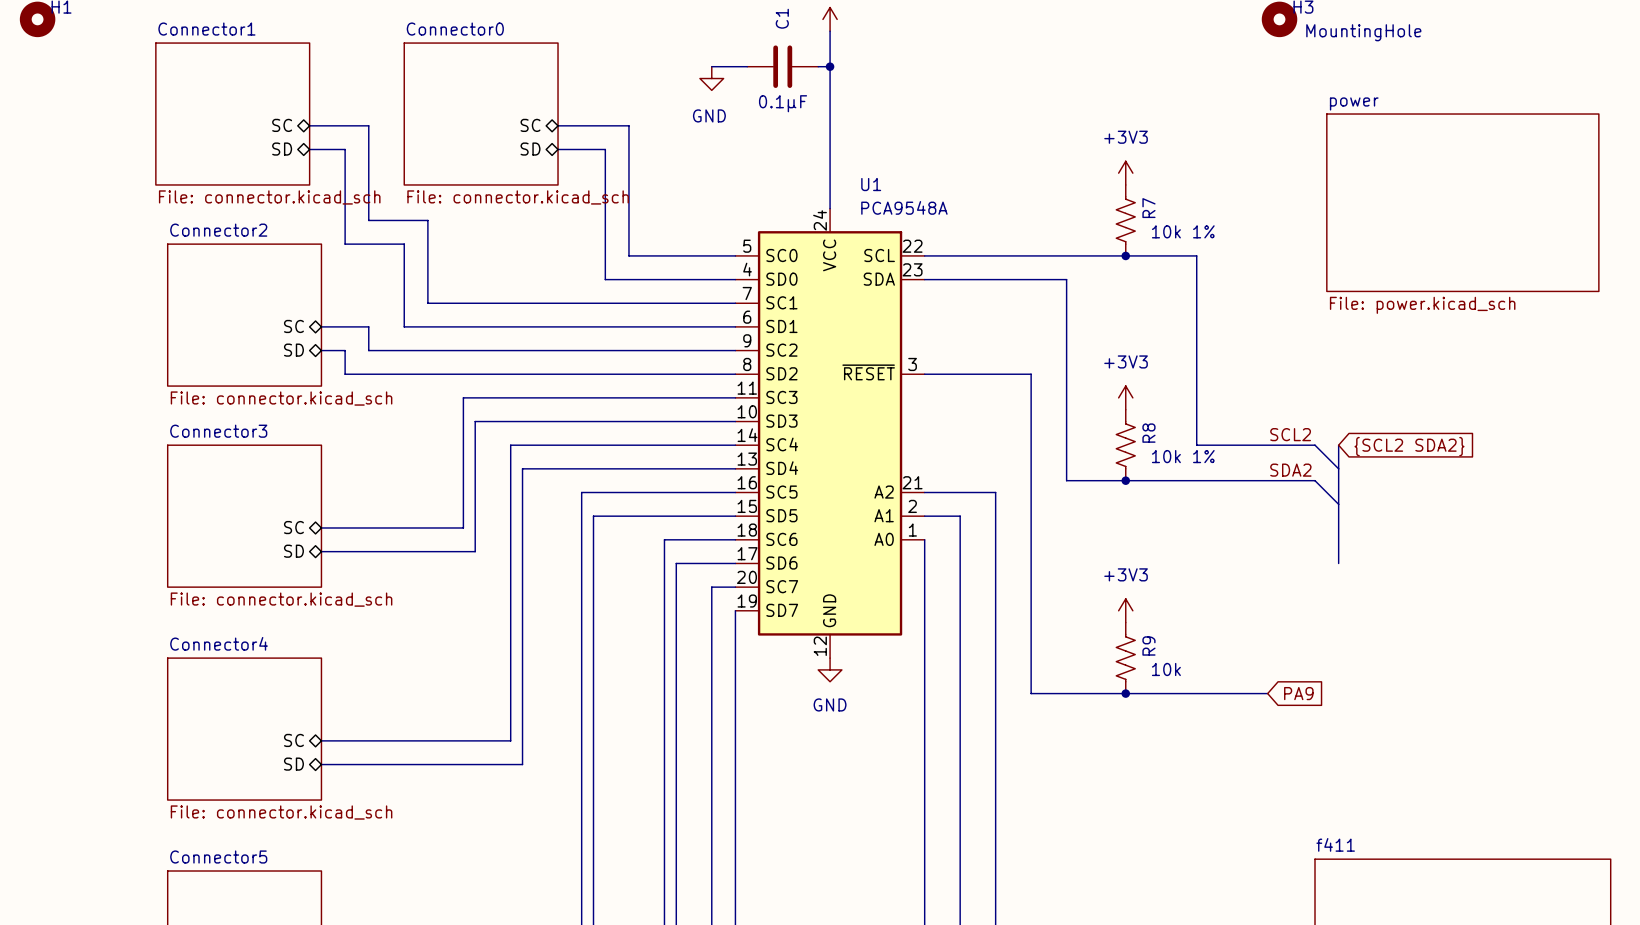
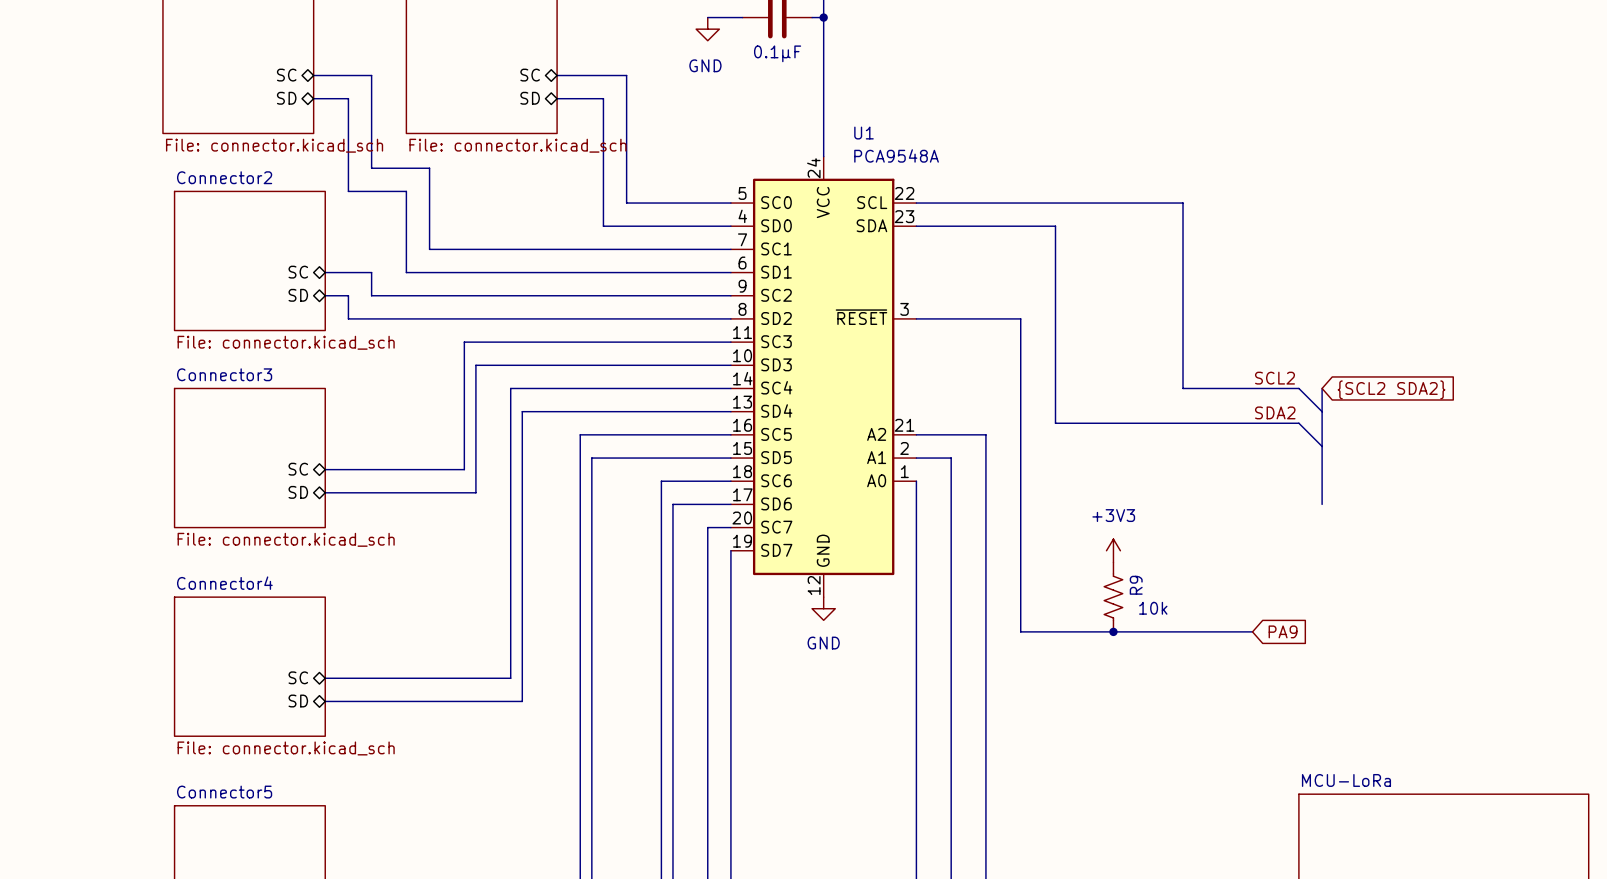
power symbol: +3V3 (1125, 173) -> none
sheet power: File: power.kicad_sch (1462, 202) -> none
R7: 10k 1% (1125, 220) -> none
junction: (1125, 255) -> none
power symbol: +3V3 (1125, 397) -> none
R8: 10k 1% (1125, 445) -> none
junction: (1125, 480) -> none
sheet f411 name: f411 (1335, 844) -> MCU-LoRa (1346, 780)

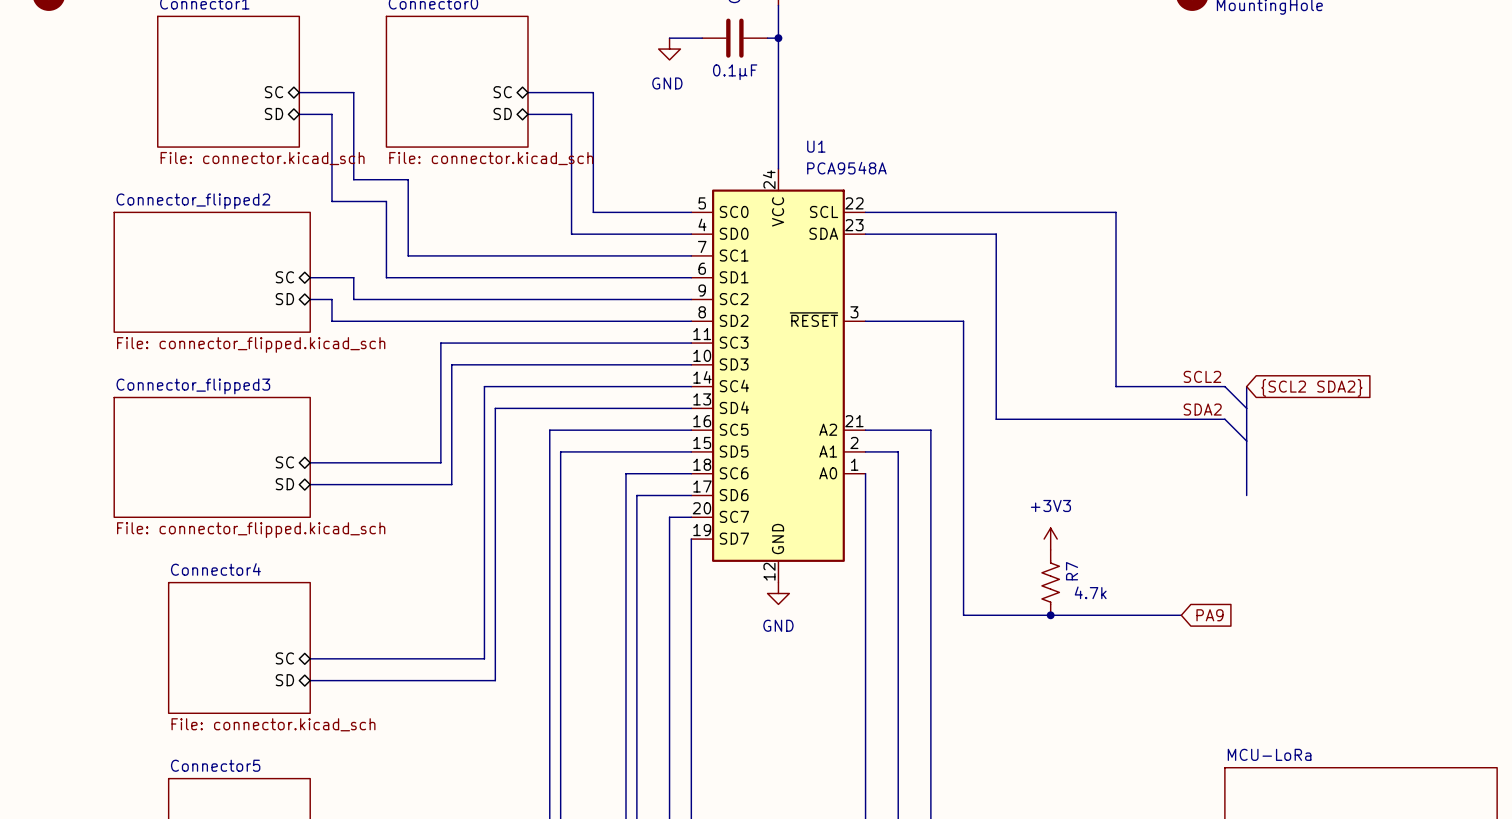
sheet Connector2: File: connector.kicad_sch (249, 260) -> none
sheet Connector_flipped2: none -> File: connector_flipped.kicad_sch (212, 272)
sheet Connector3: File: connector.kicad_sch (249, 458) -> none
sheet Connector_flipped3: none -> File: connector_flipped.kicad_sch (212, 457)
R9 name: R9 (1136, 585) -> R7 (1072, 571)
R9 value: 10k (1153, 608) -> 4.7k (1090, 592)

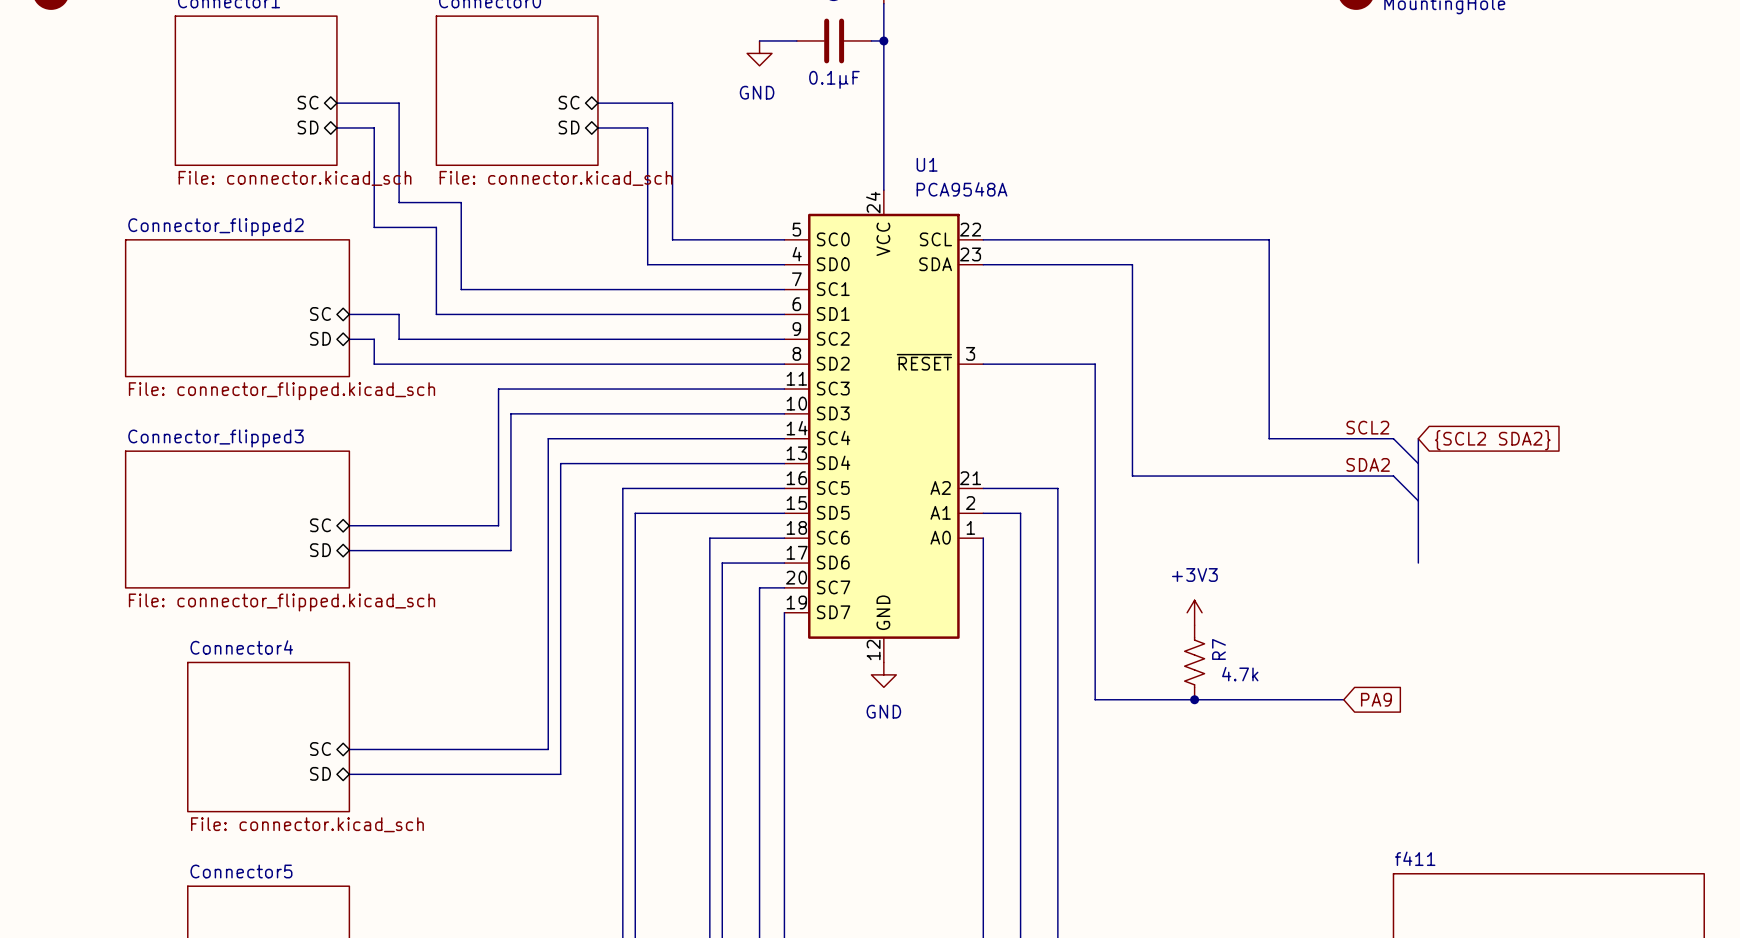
sheet MCU-LoRa name: MCU-LoRa (1269, 754) -> f411 (1415, 858)

